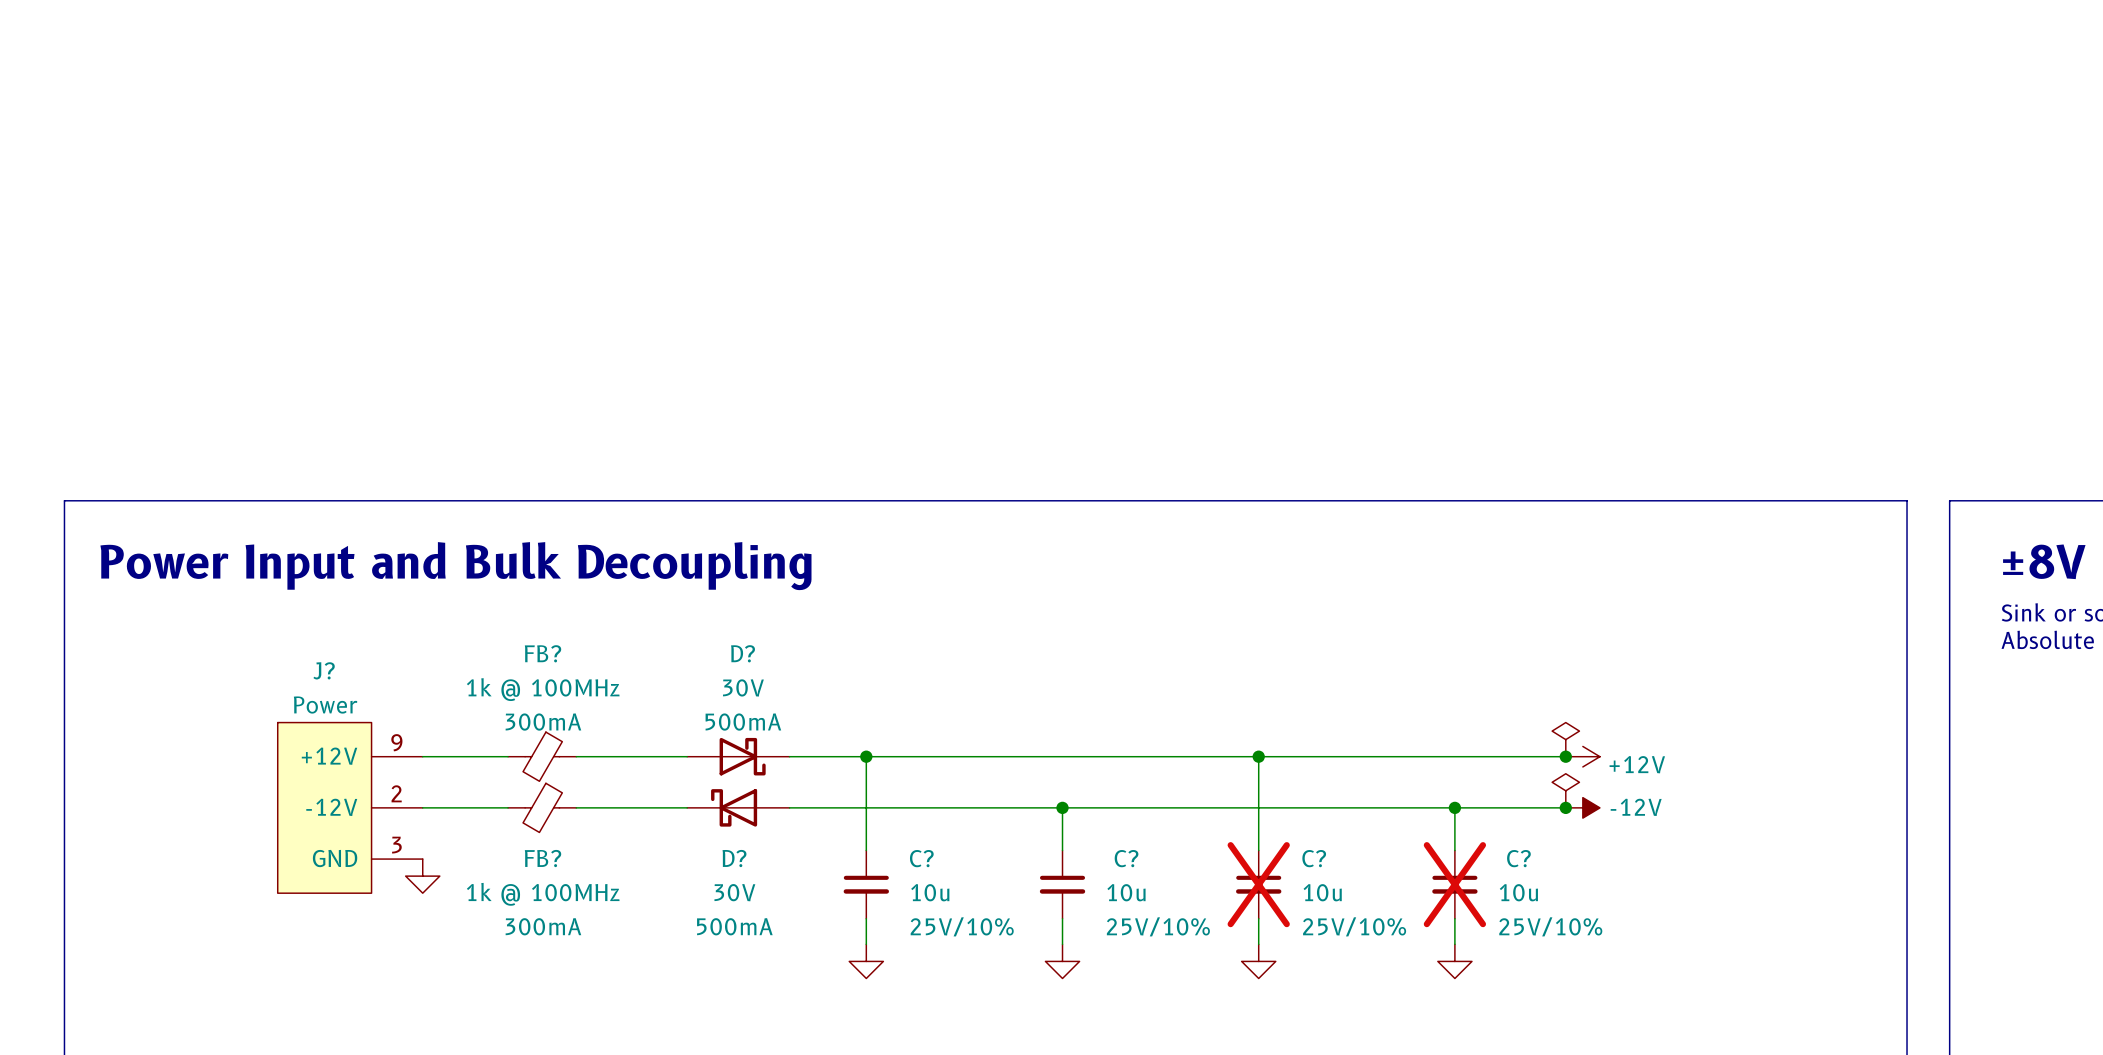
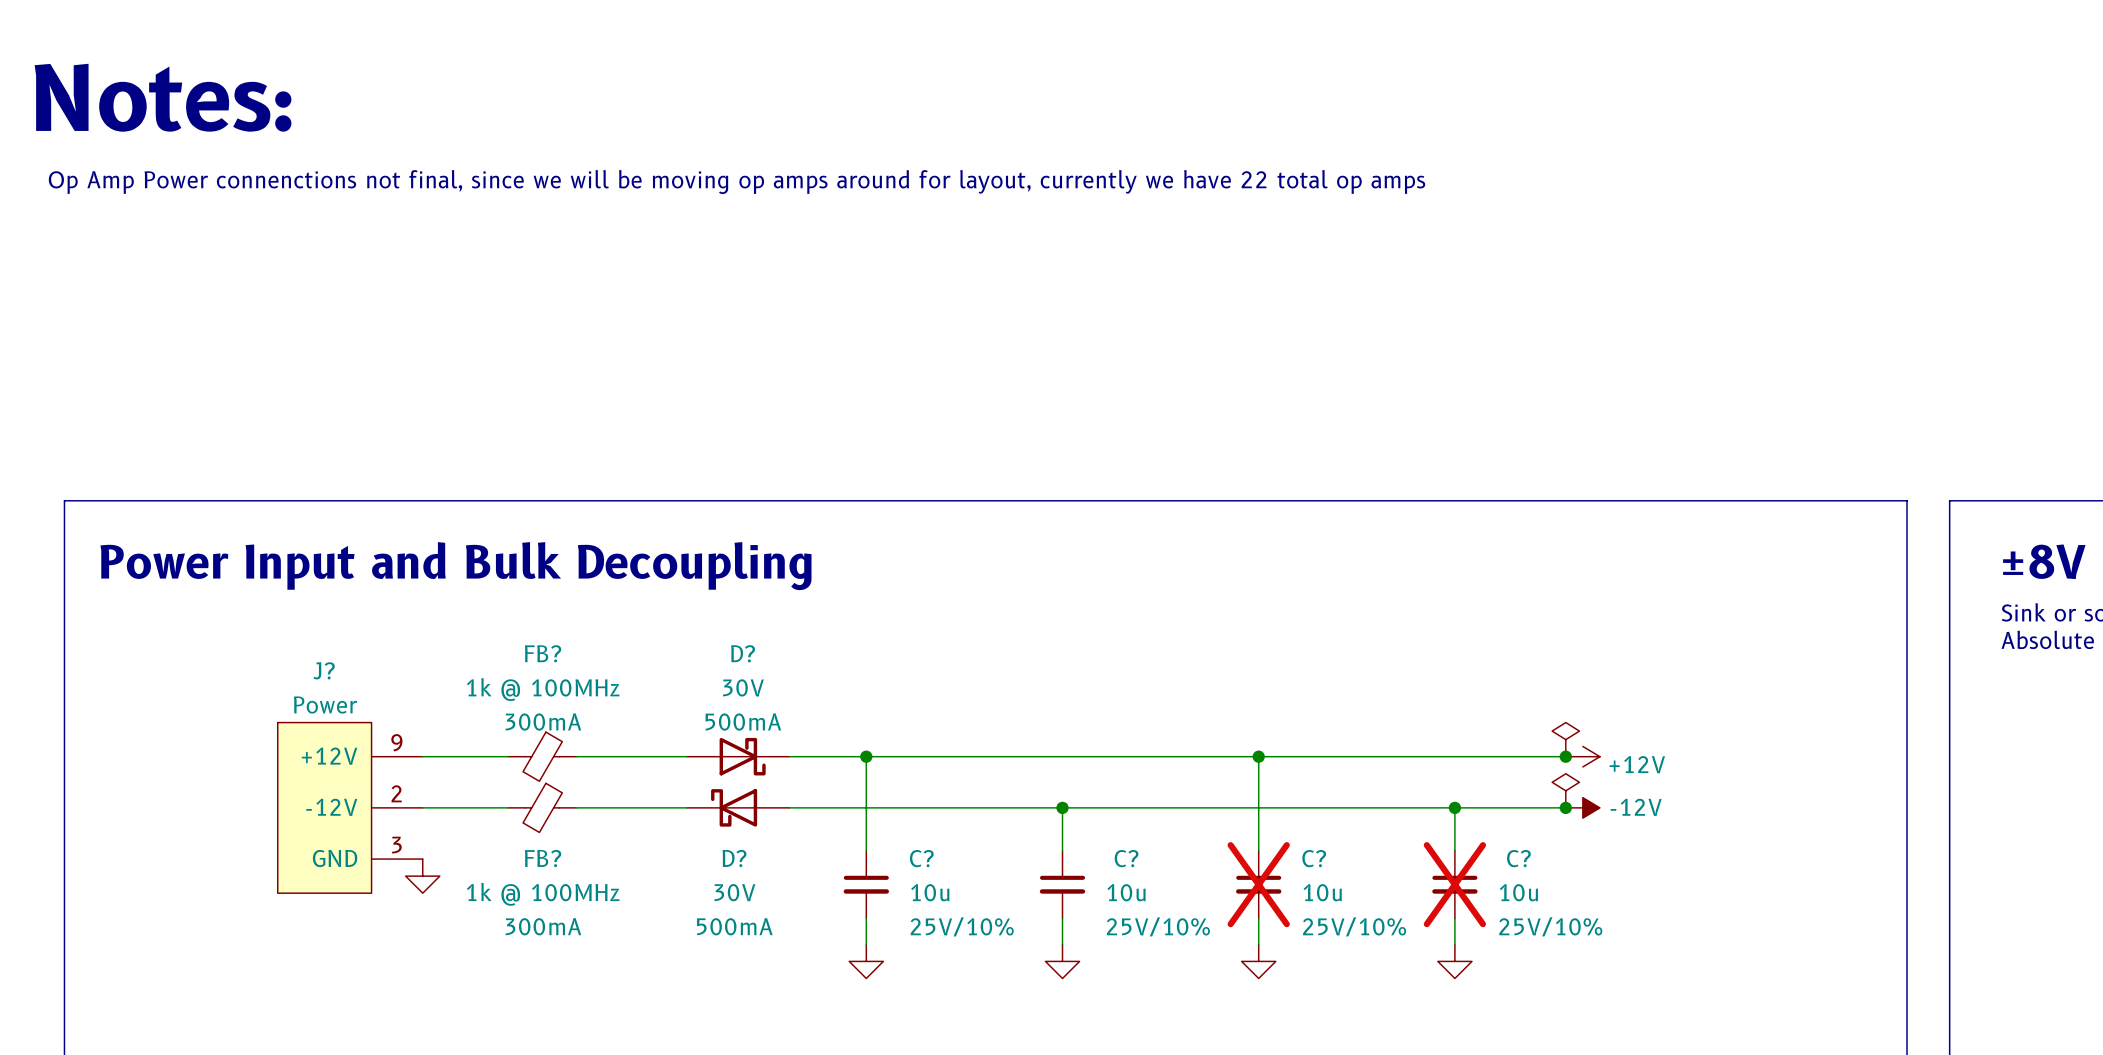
text: none -> Notes: (163, 97)
text: none -> Op Amp Power connenctions not final, since we will be moving op amps around for layout, currently we have 22 total op amps (737, 182)

